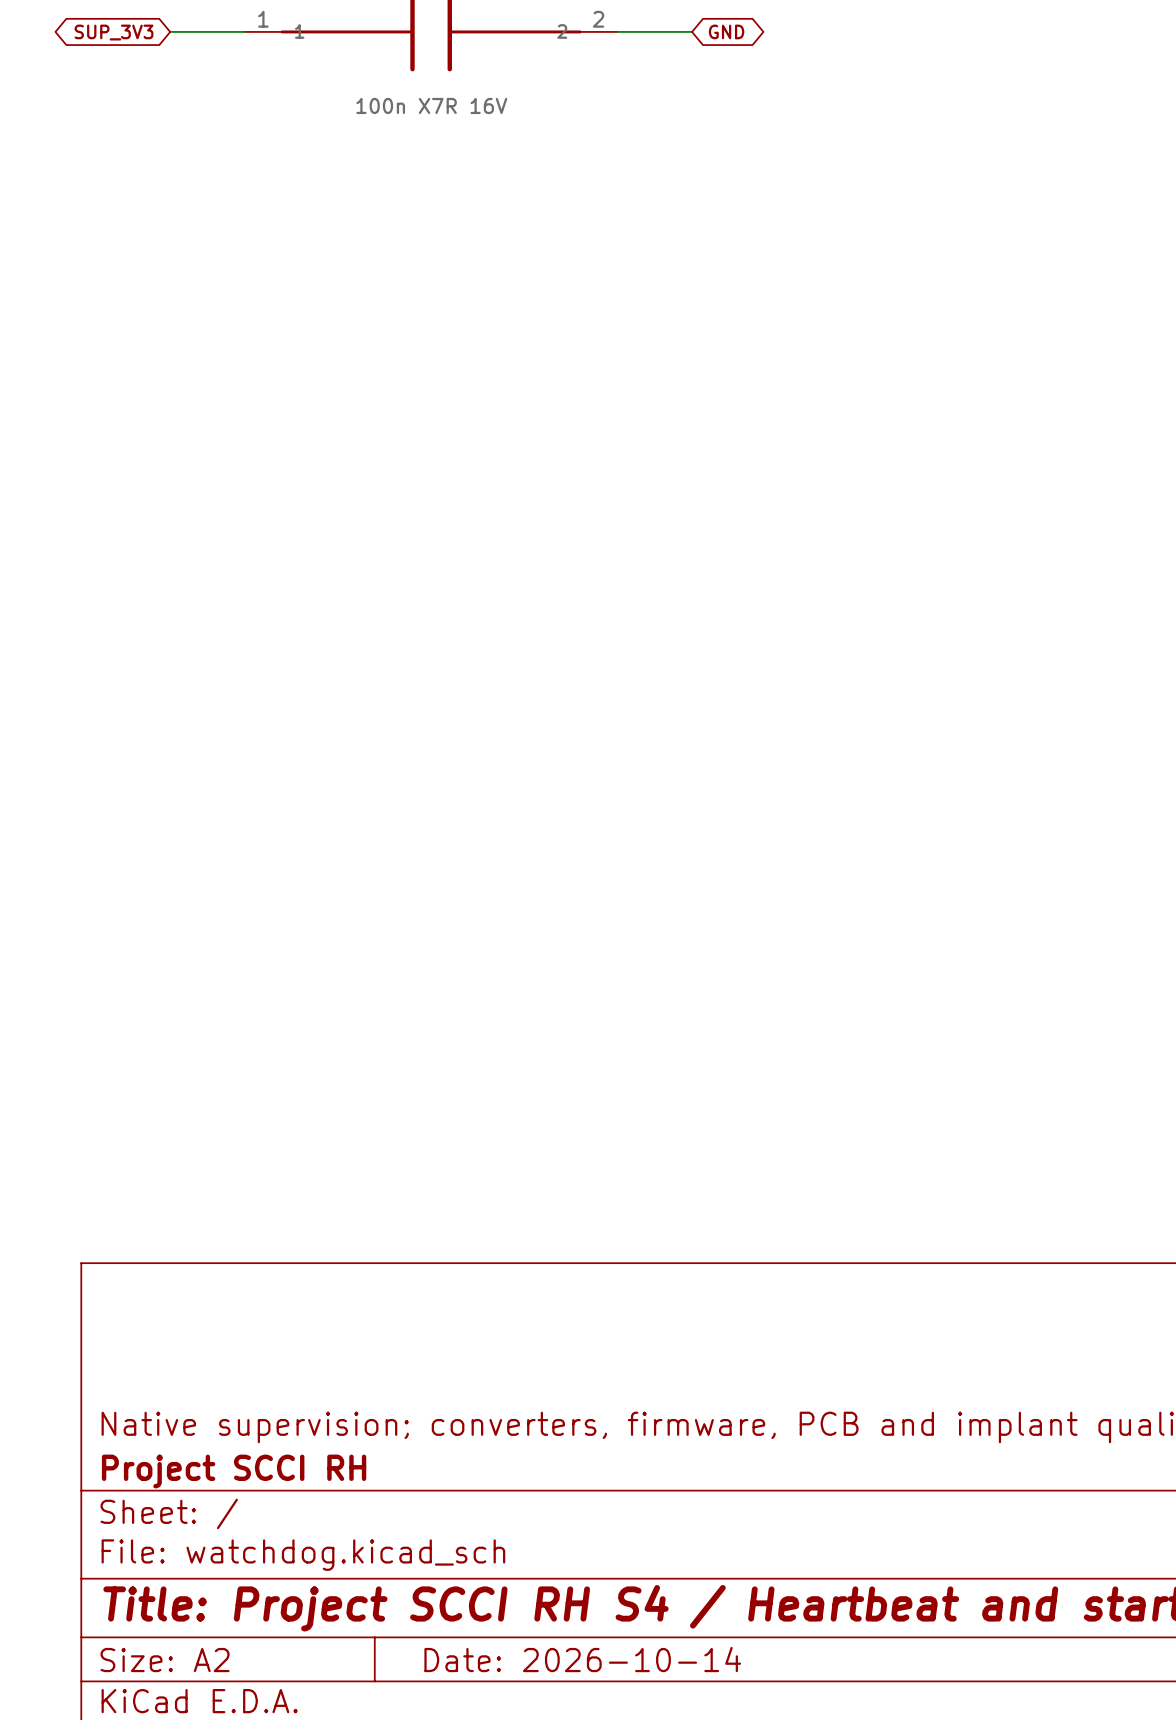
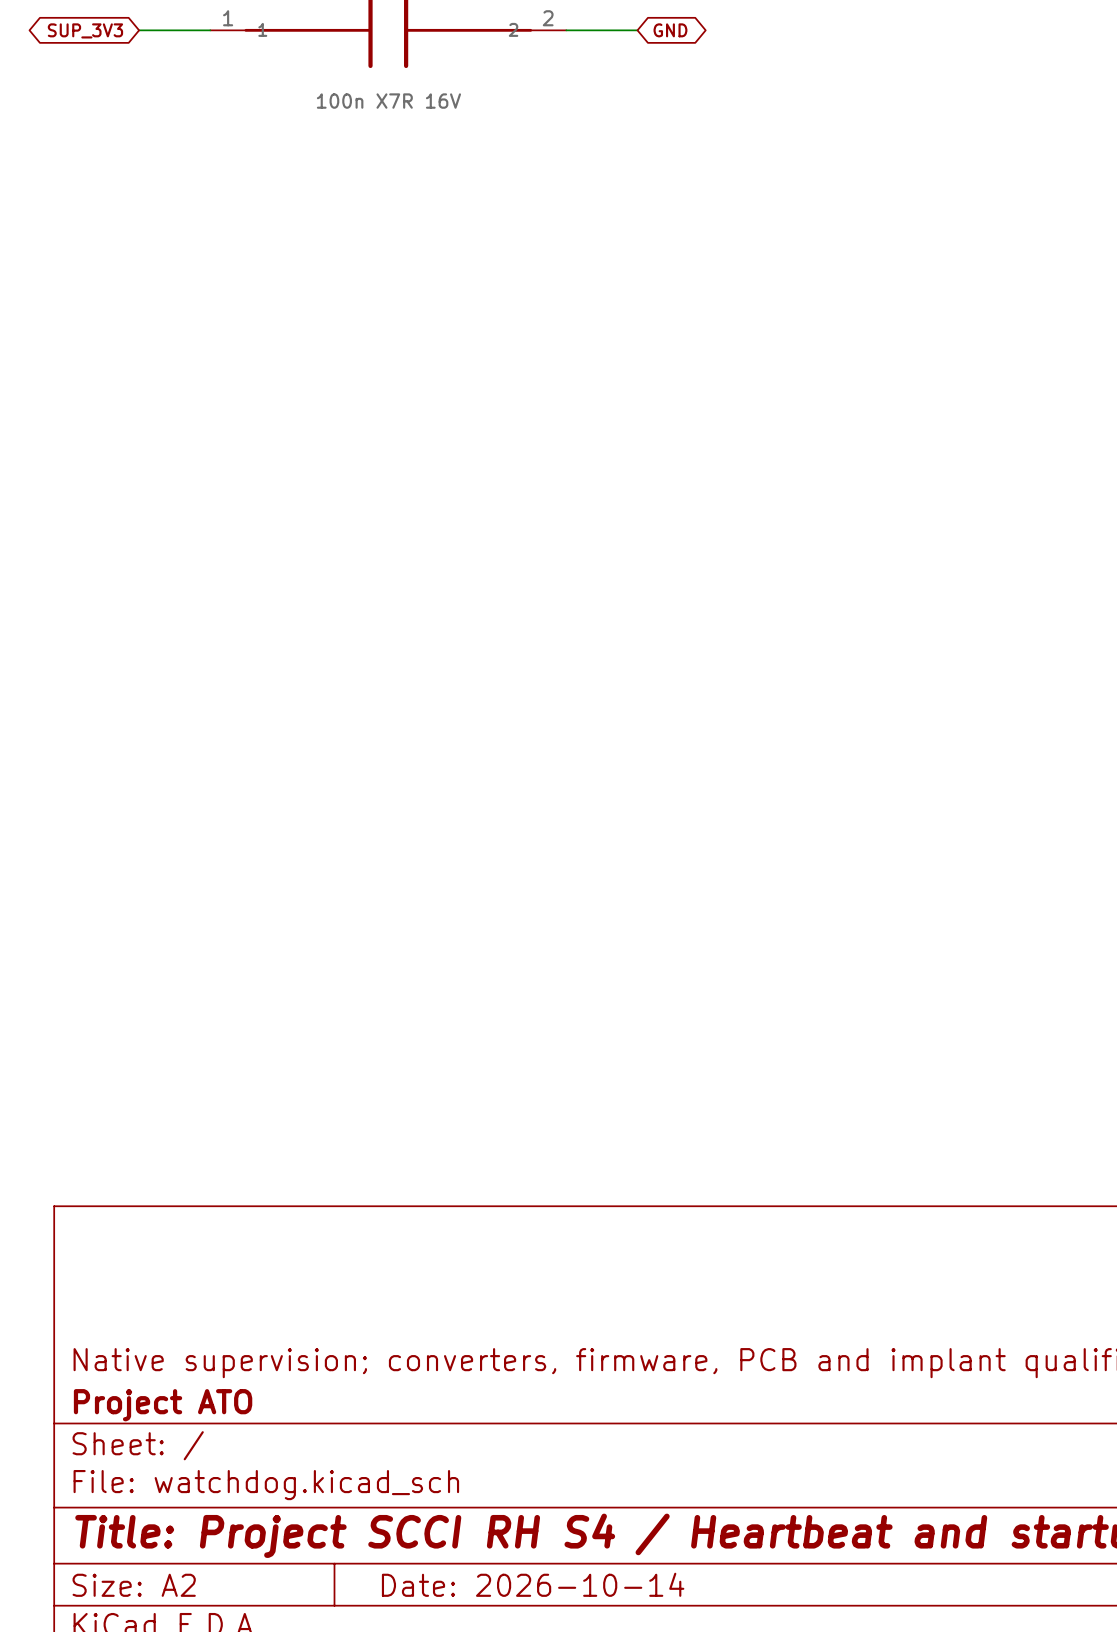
title block: Project SCCI RH (234, 1471) -> Project ATO (163, 1405)

